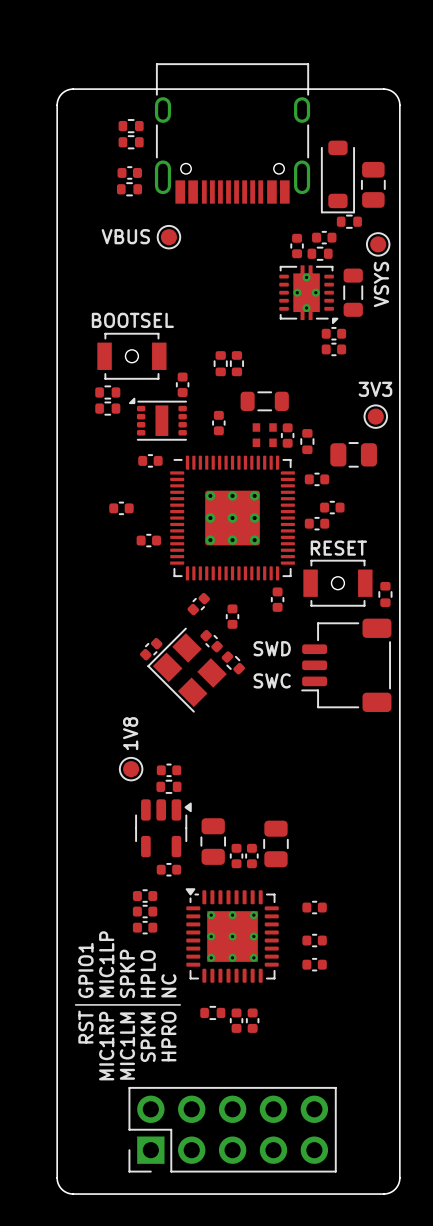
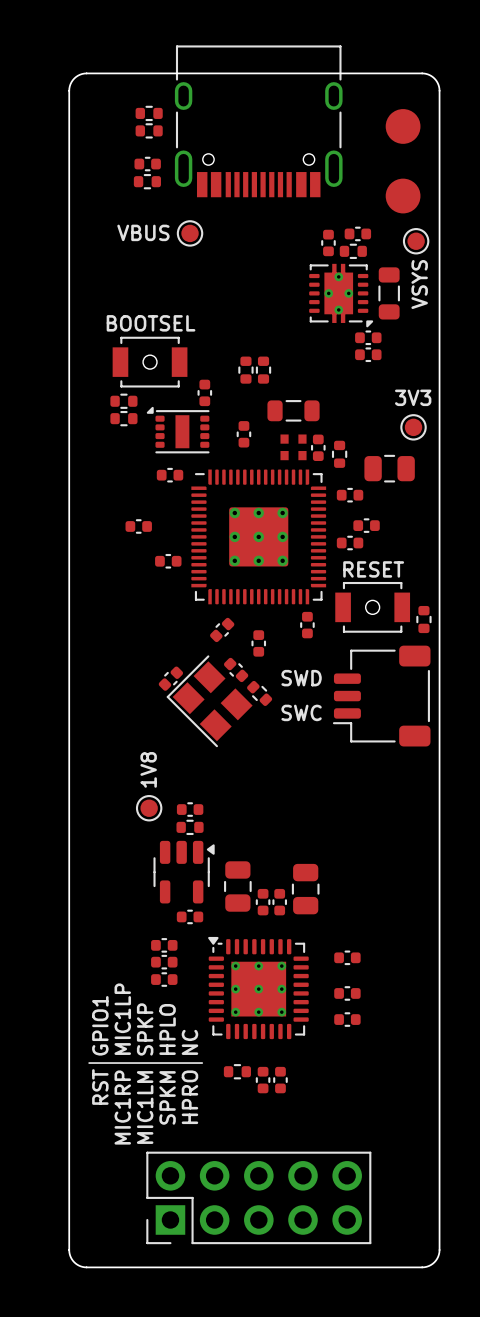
part: none -> (403, 161)
part: (337, 176) -> none
part: (373, 184) -> none
part: (349, 221) -> none

